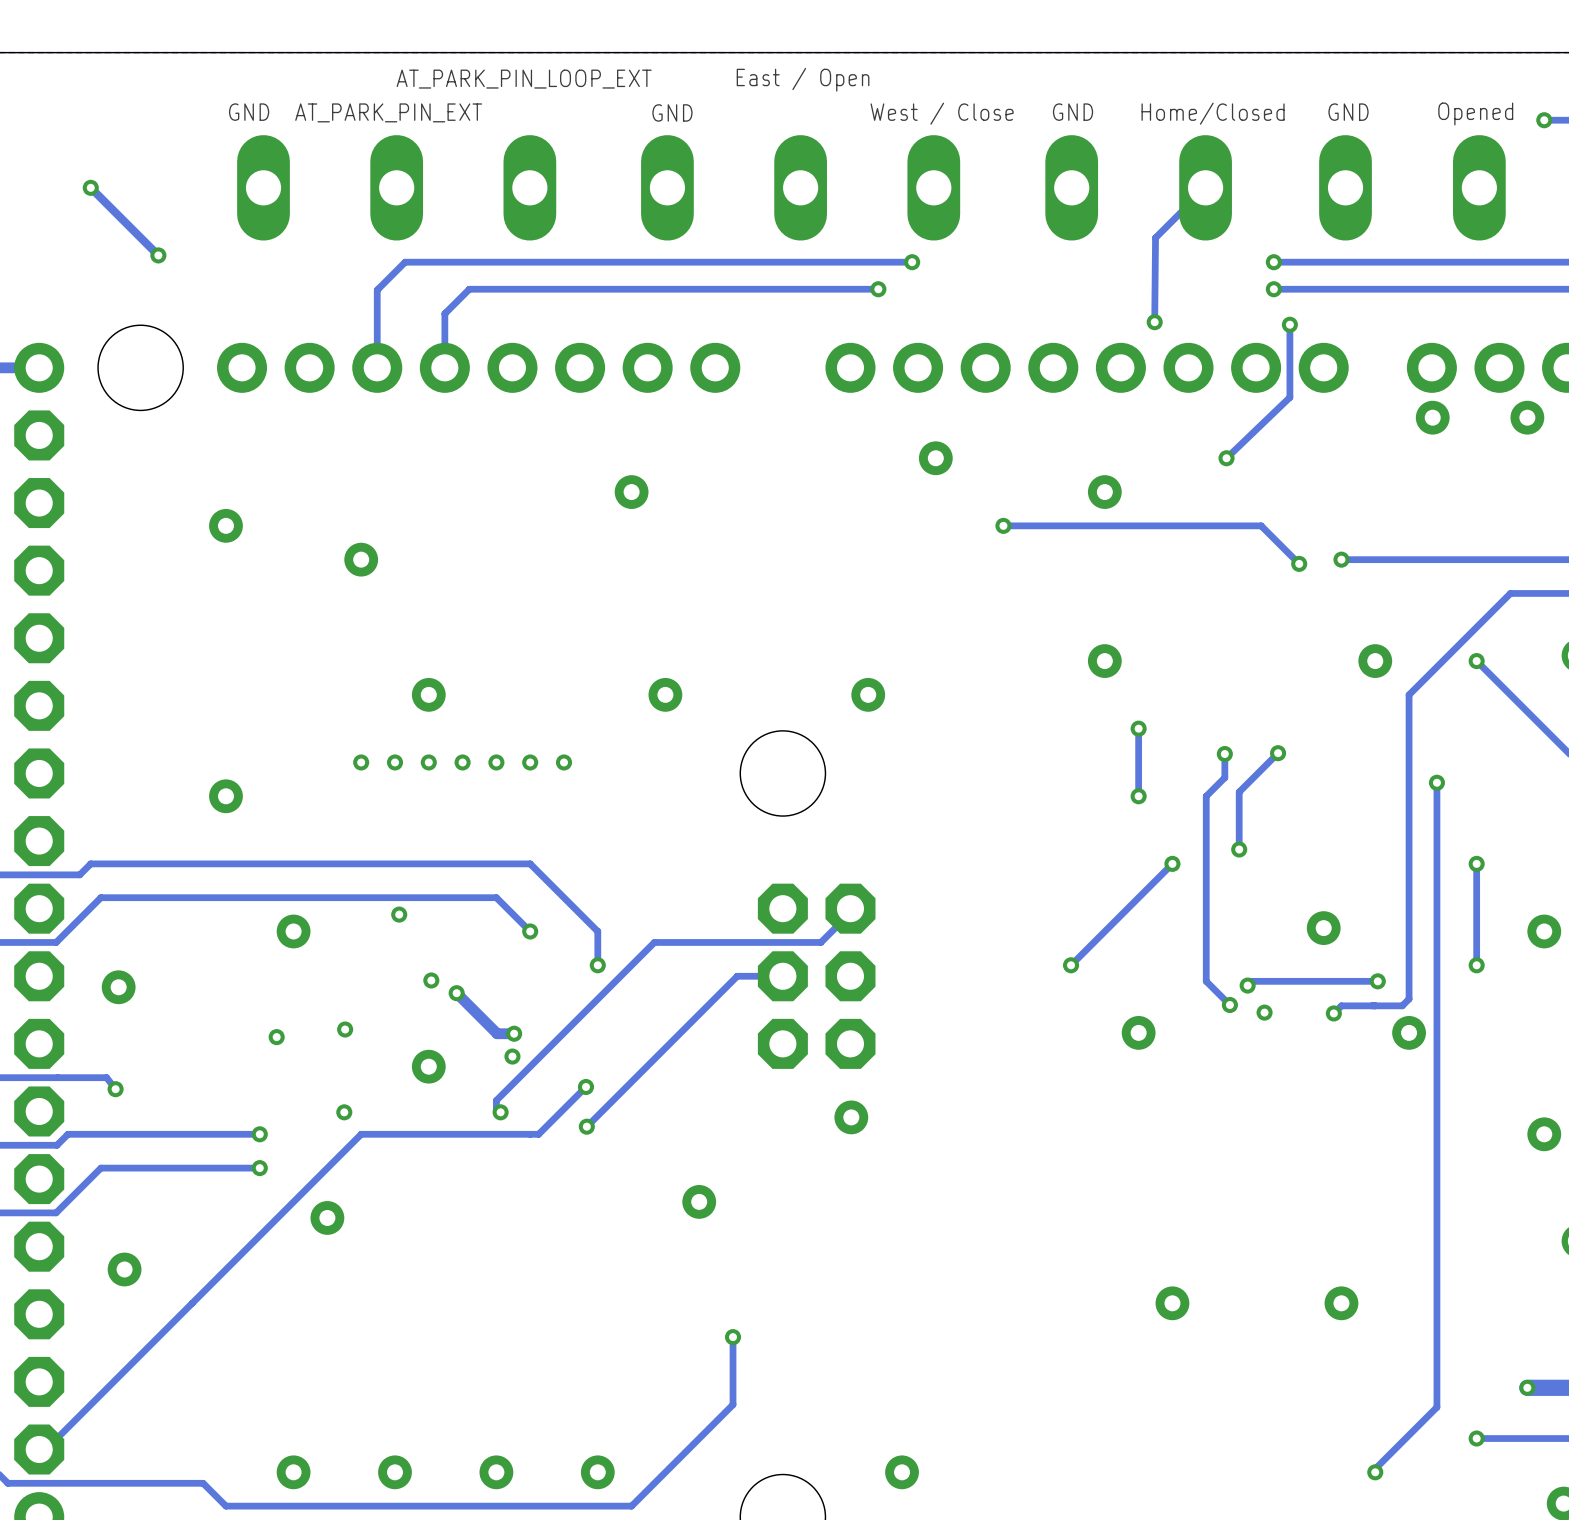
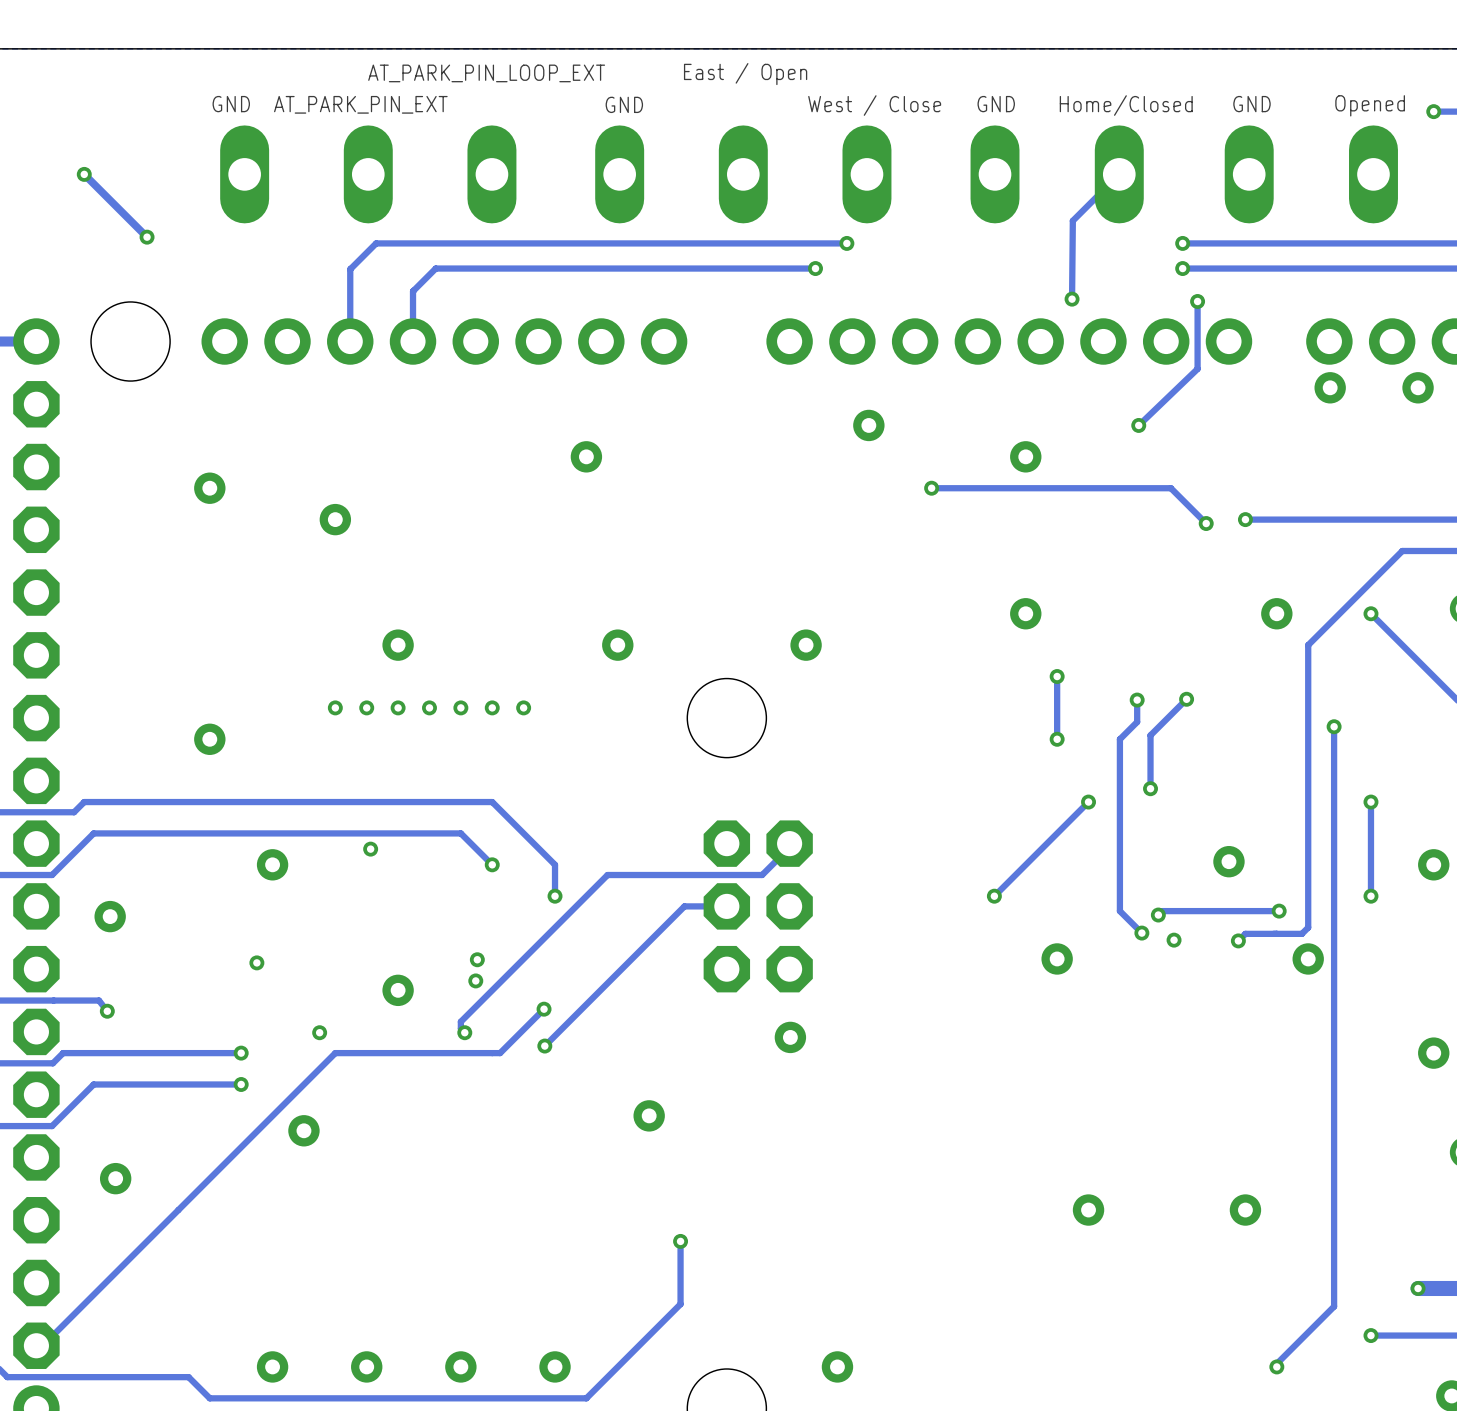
via: (431, 980) -> none
track: (456, 993) (497, 1033) (514, 1033) -> none
via: (456, 993) -> none
via: (345, 1029) -> none

